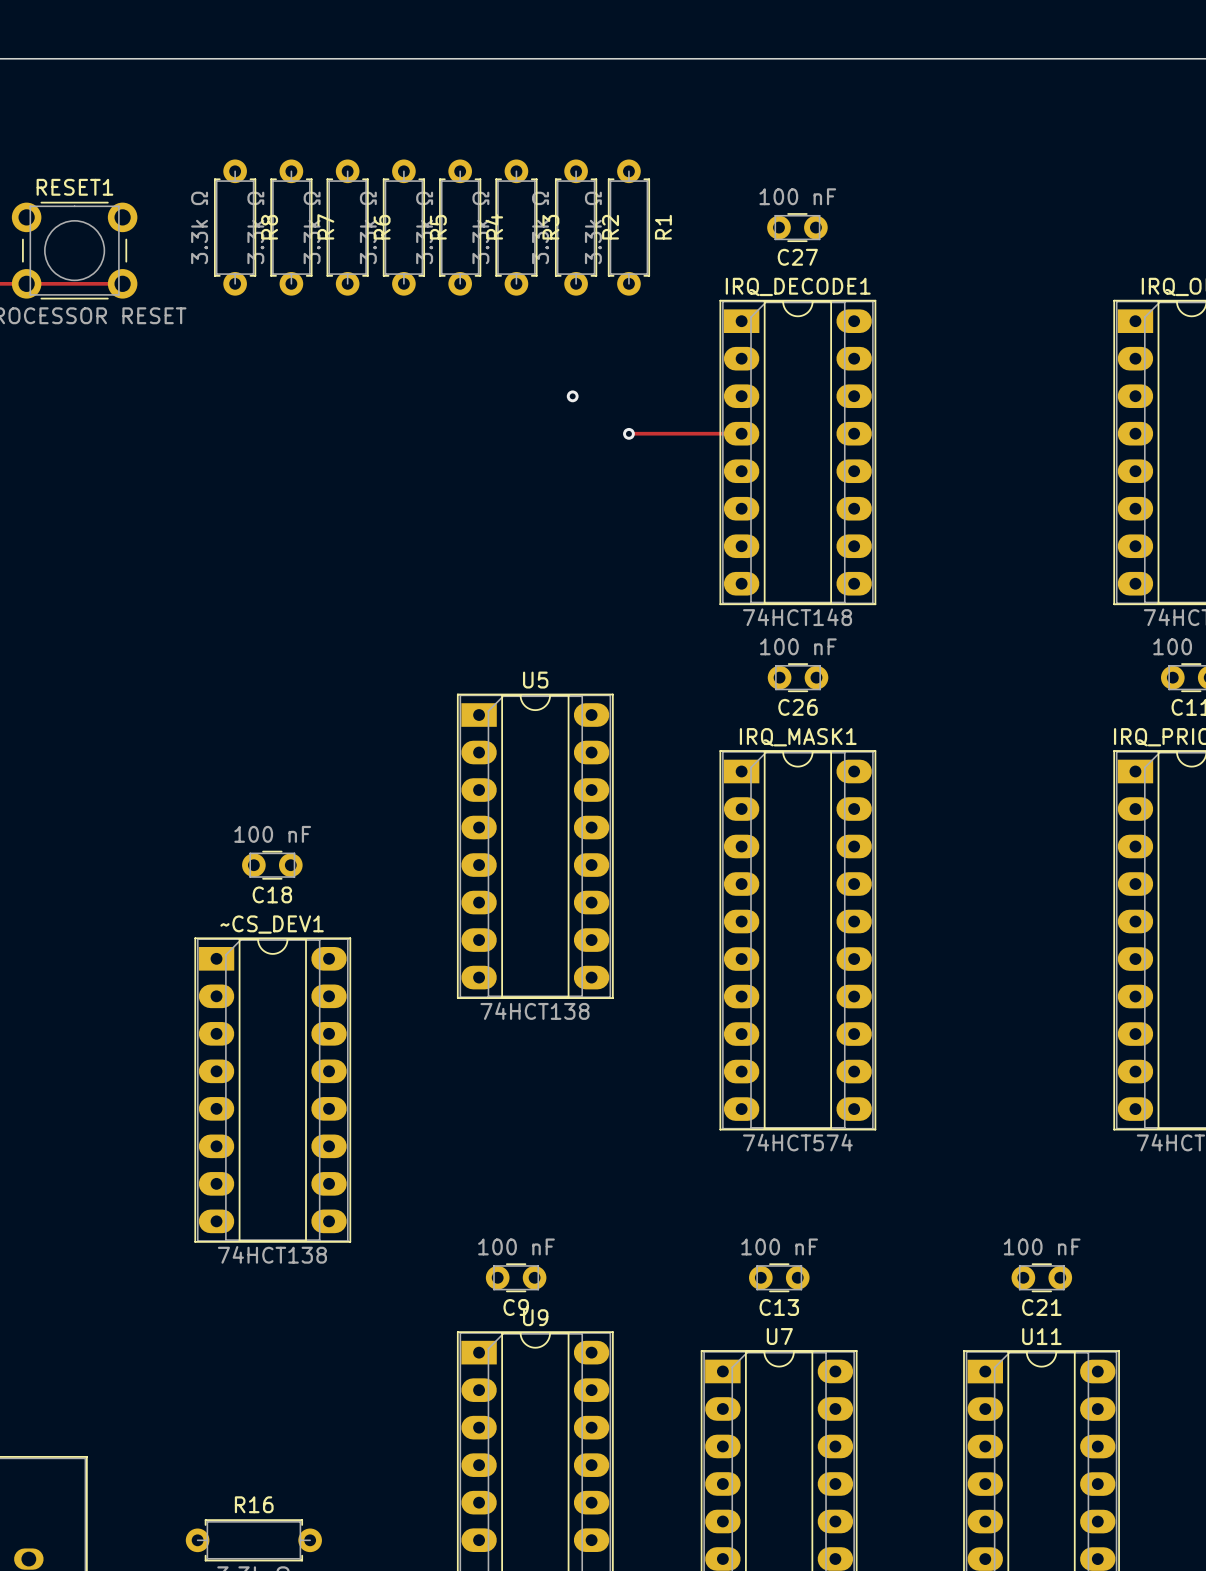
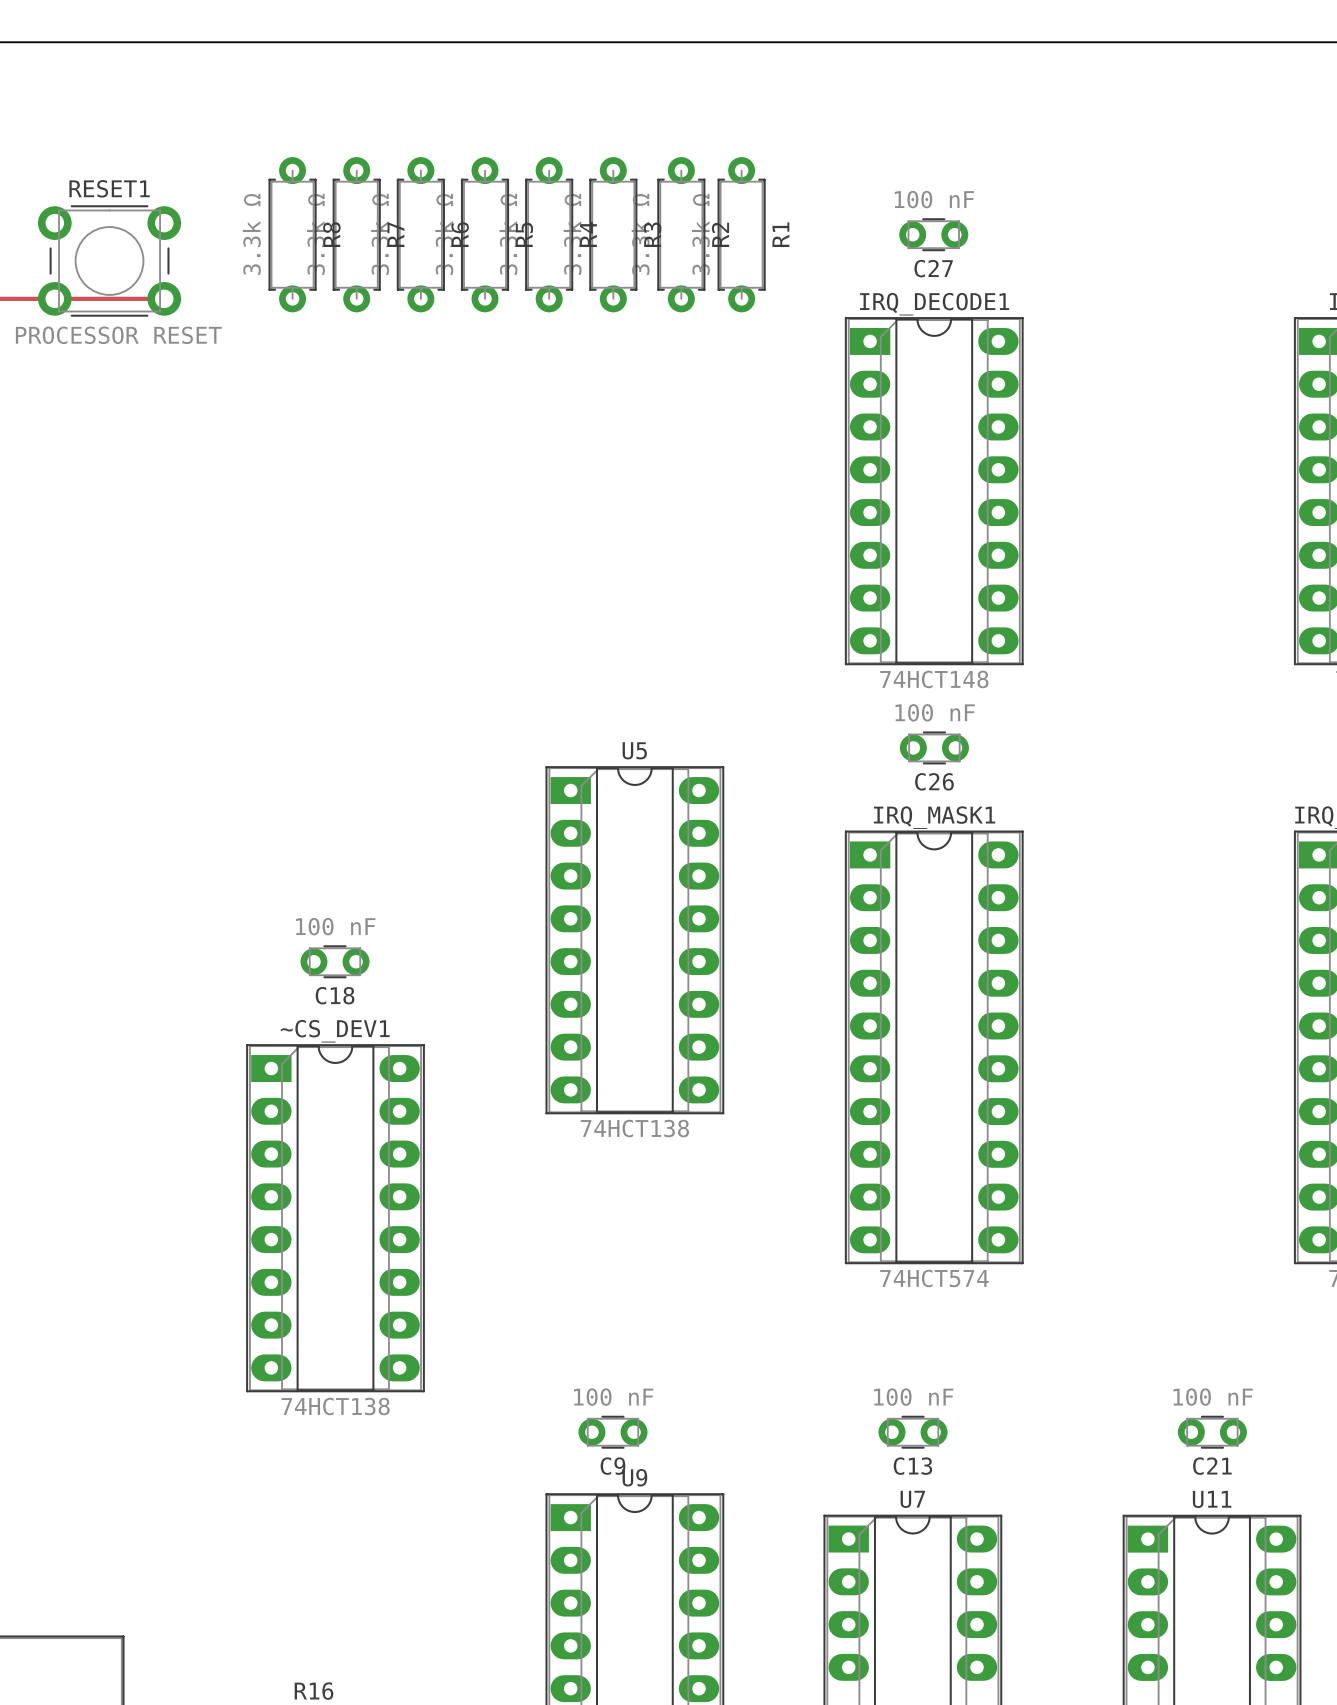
via: (572, 396) -> none
via: (628, 433) -> none
track: (629, 433) (741, 433) -> none

